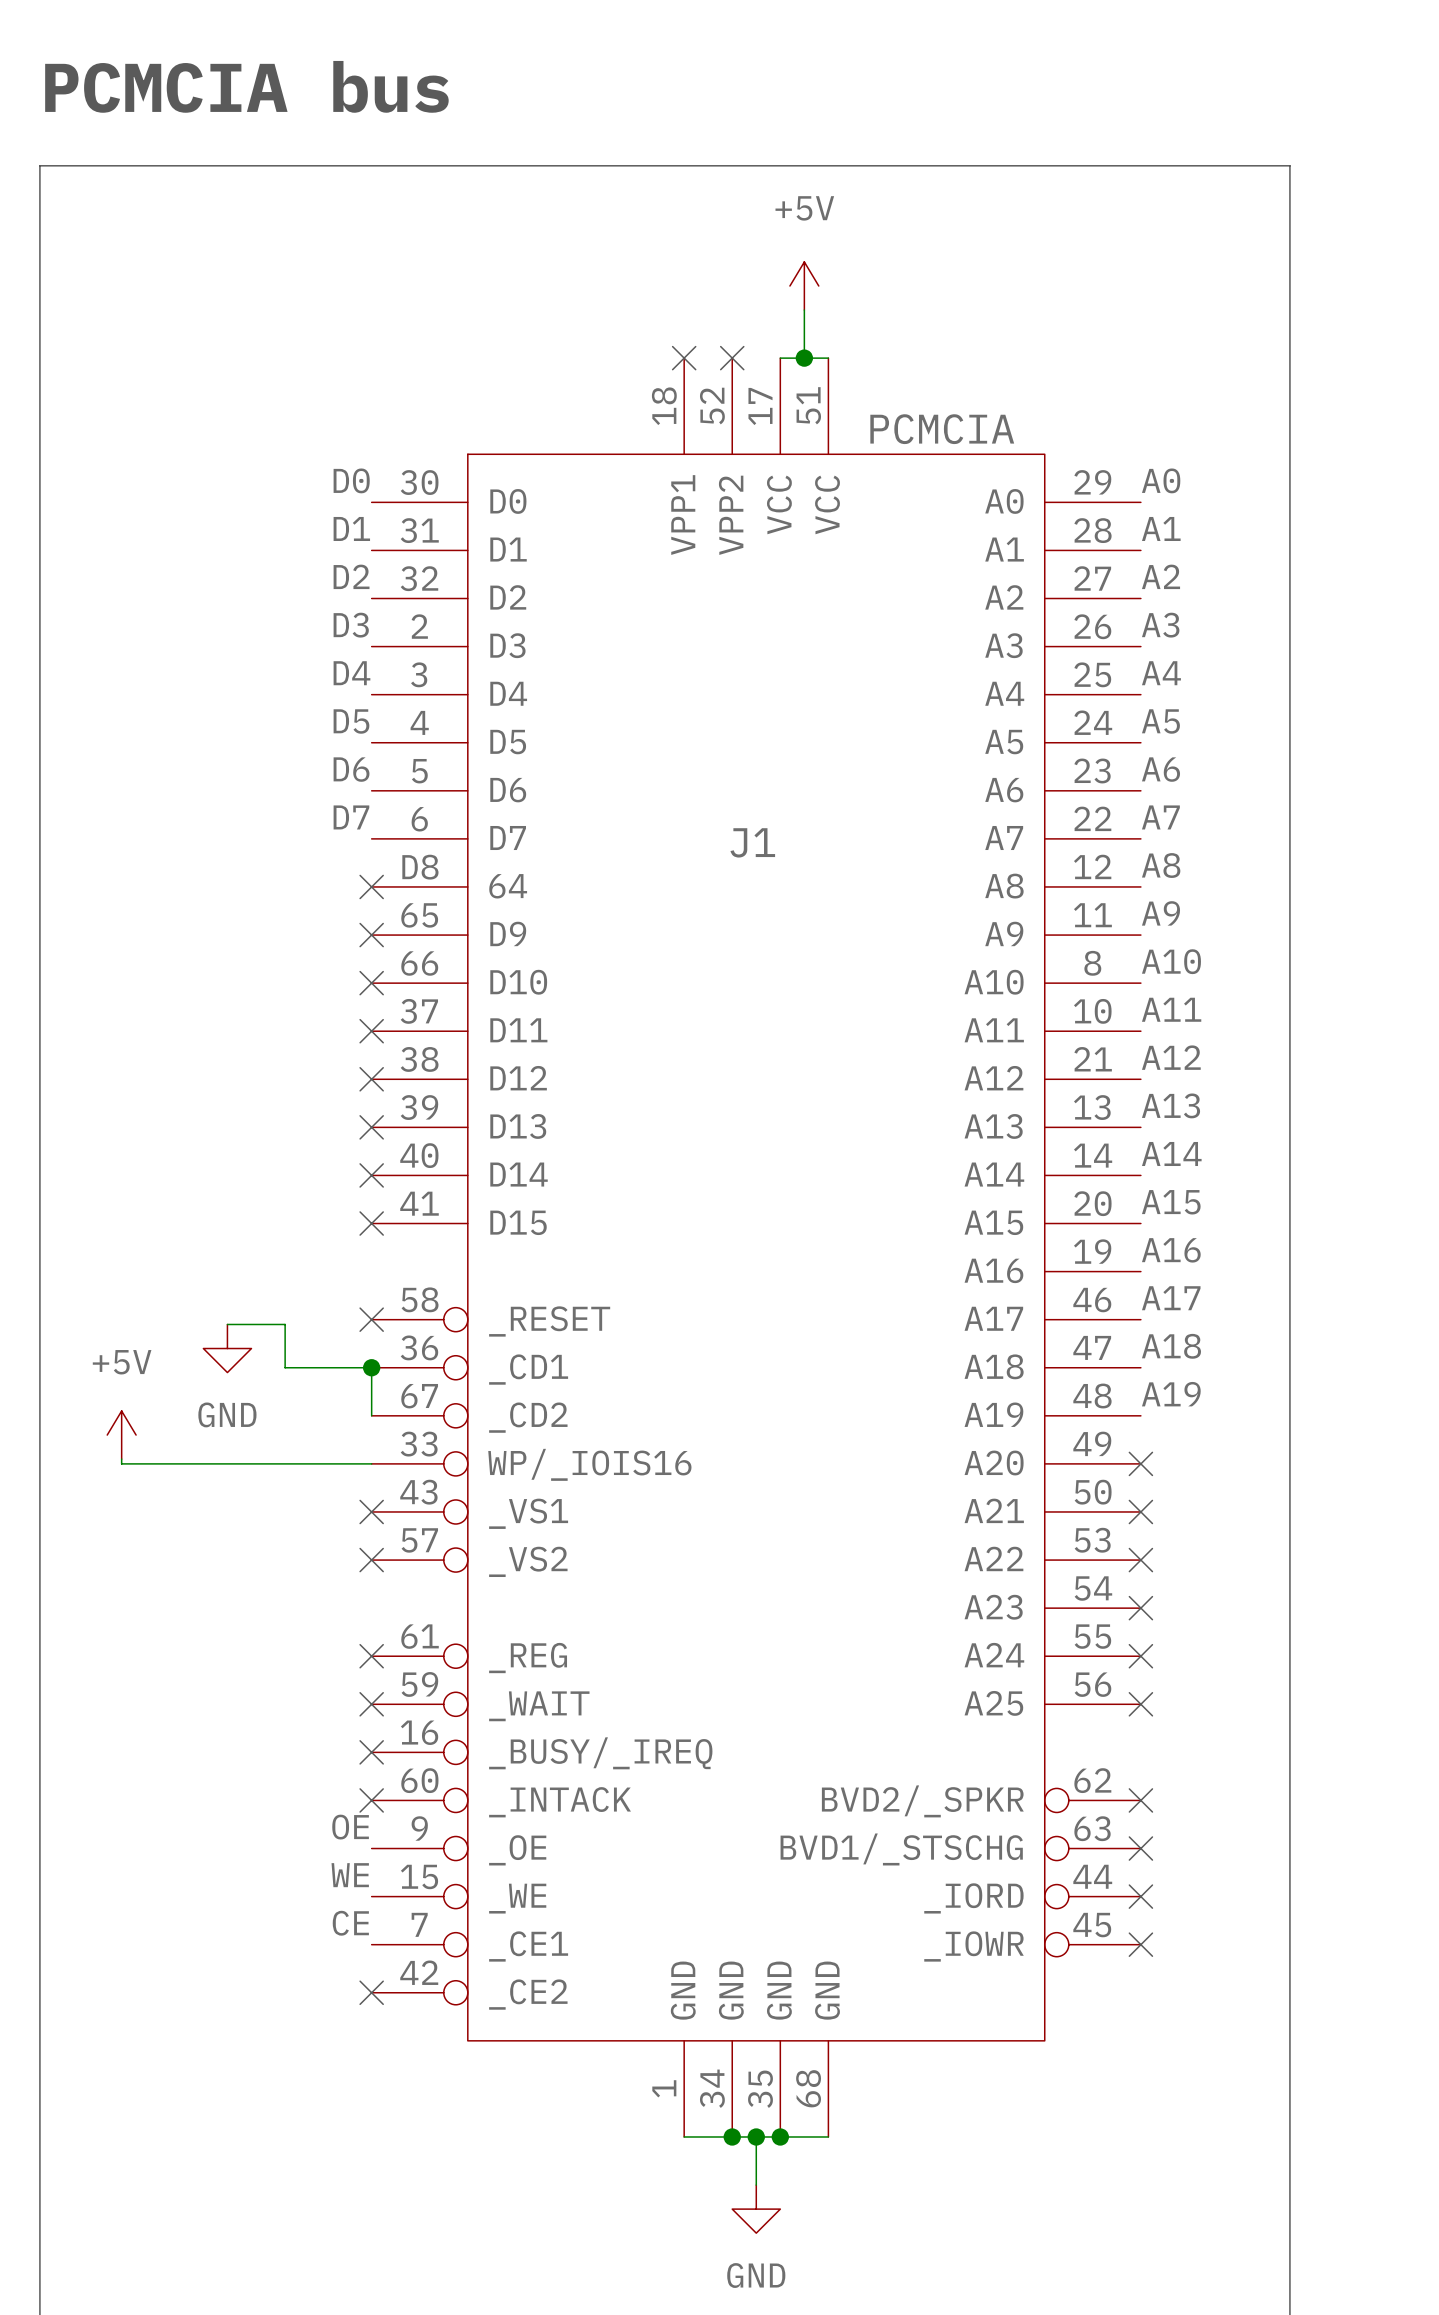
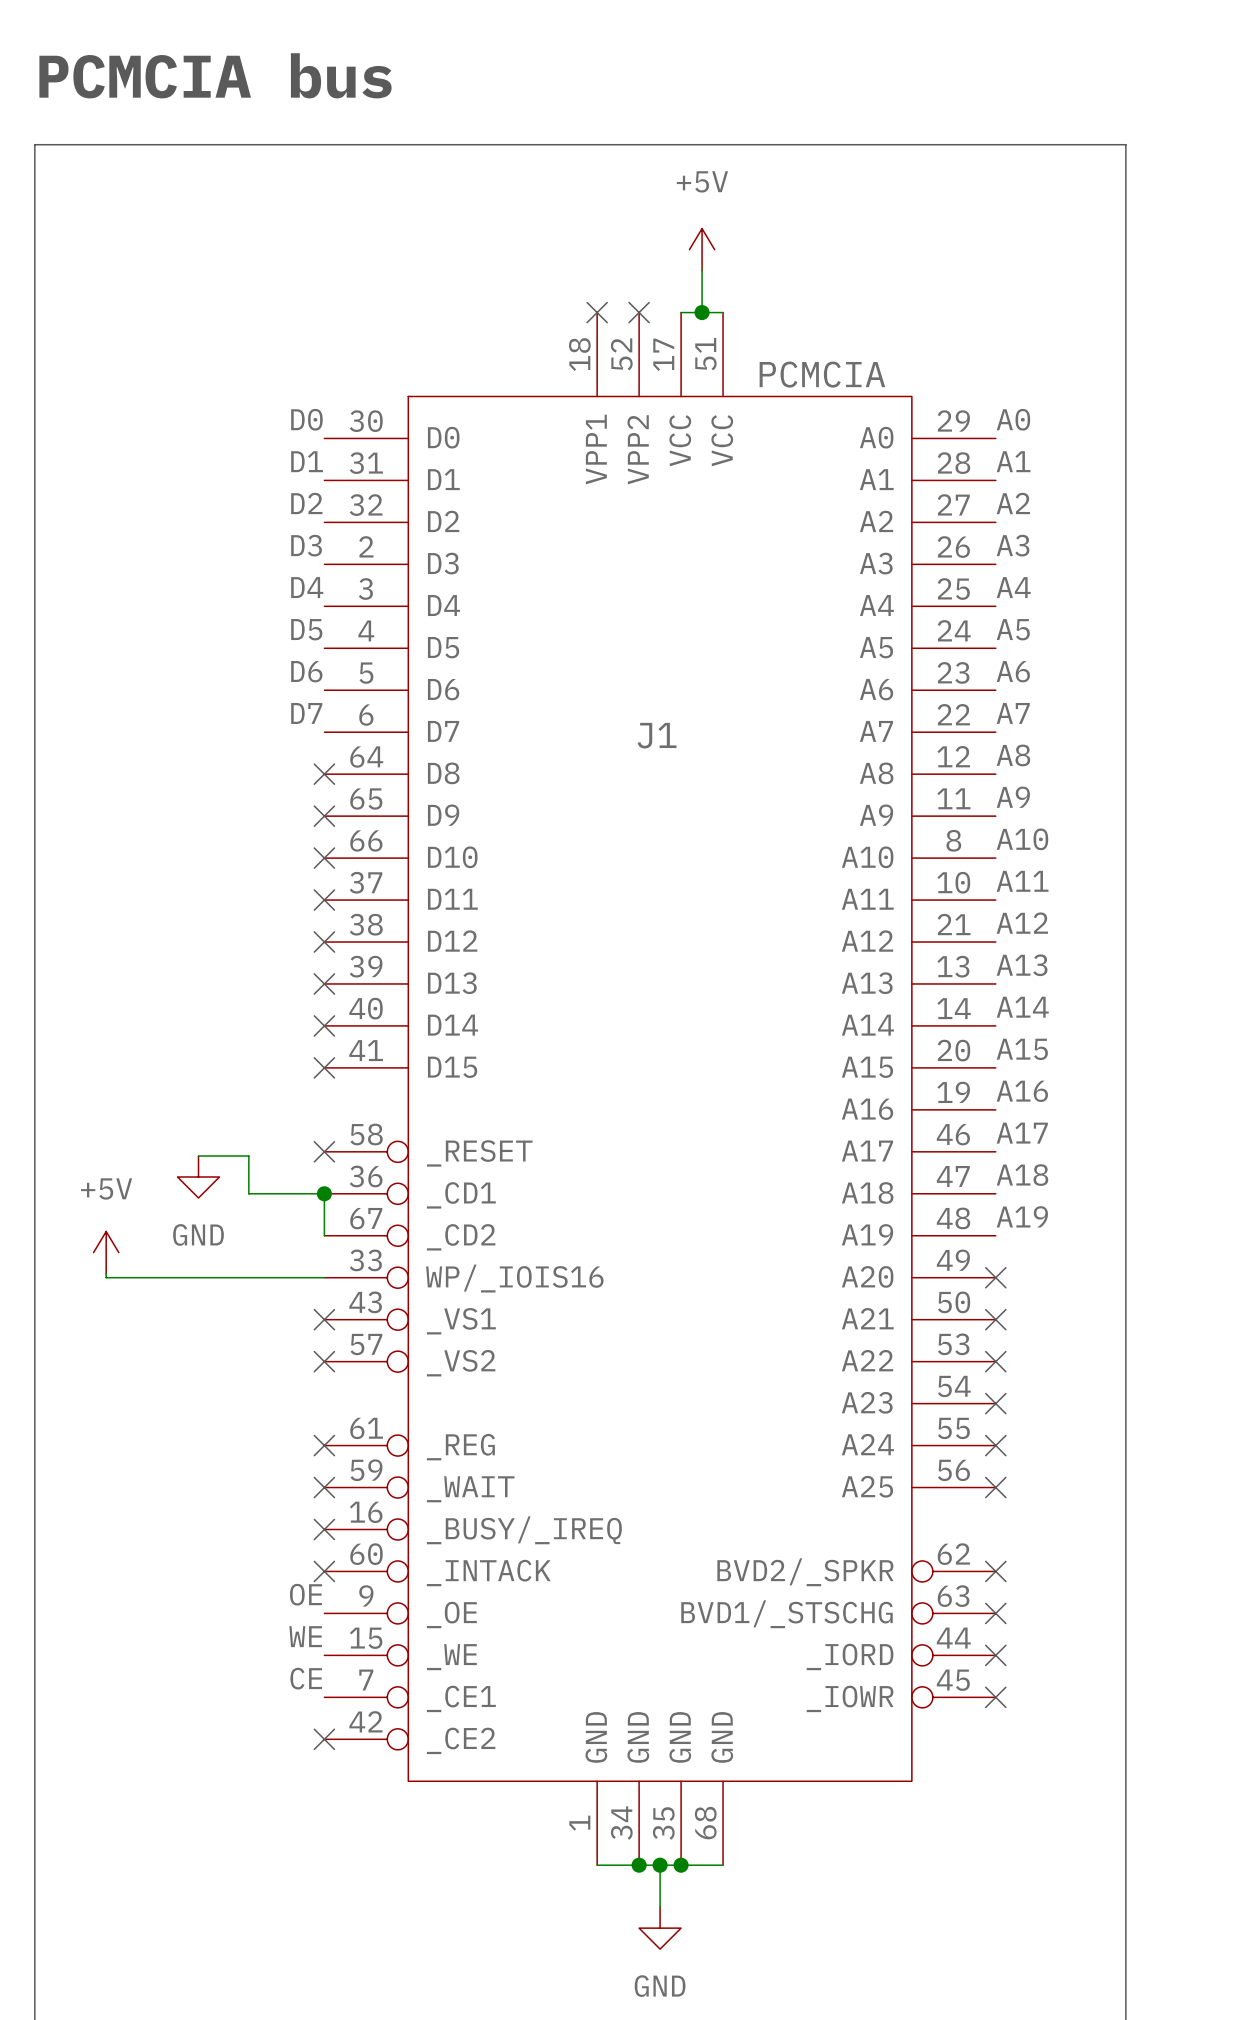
J1 pin number: D8 (420, 867) -> 64 (366, 757)
J1 pin name: 64 (508, 886) -> D8 (443, 773)

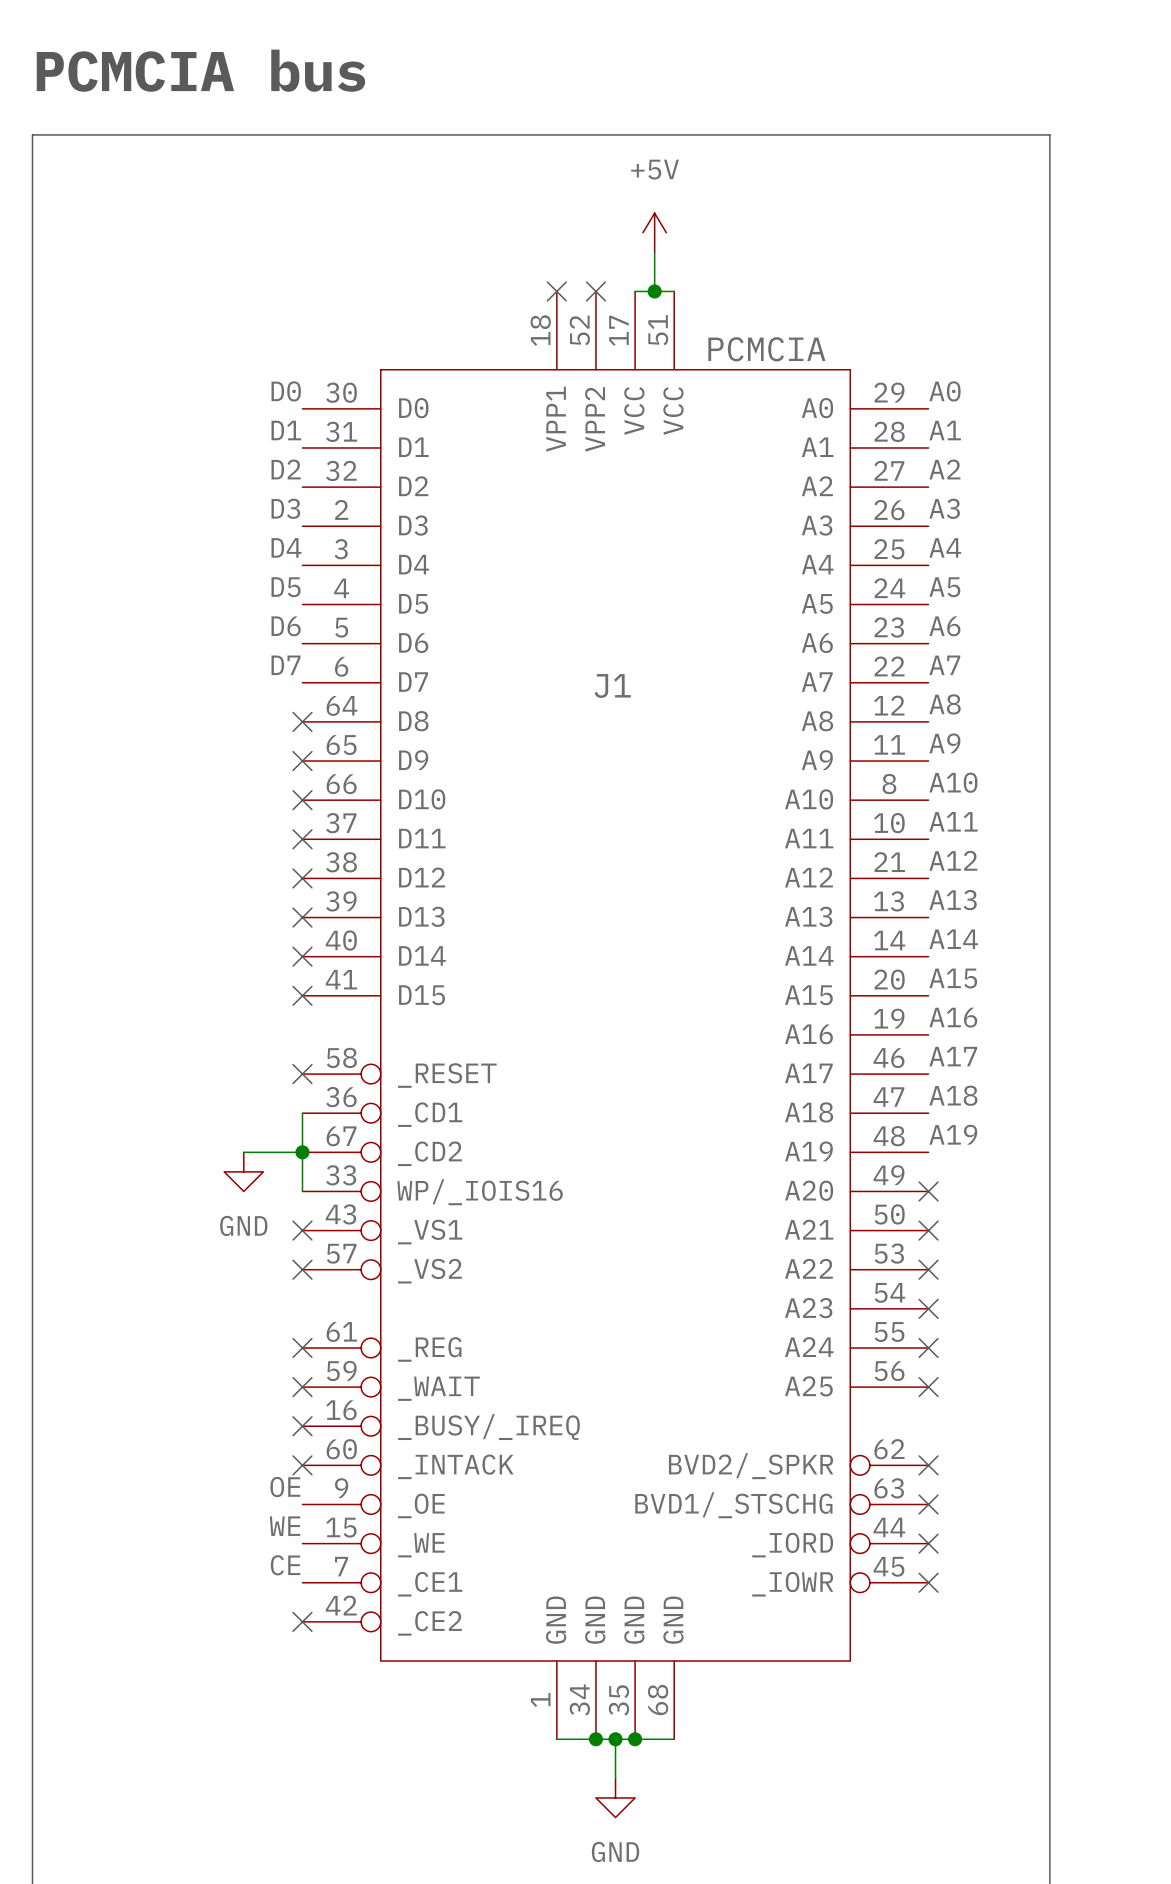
wire: (198, 1156) (248, 1156) (248, 1193) (324, 1193) -> none
power symbol position: GND (198, 1177) -> GND (243, 1171)
junction position: (324, 1193) -> (302, 1152)
power symbol: +5V (106, 1252) -> none
wire: (106, 1273) (106, 1277) (324, 1277) -> (243, 1152) (302, 1152) (302, 1191)

